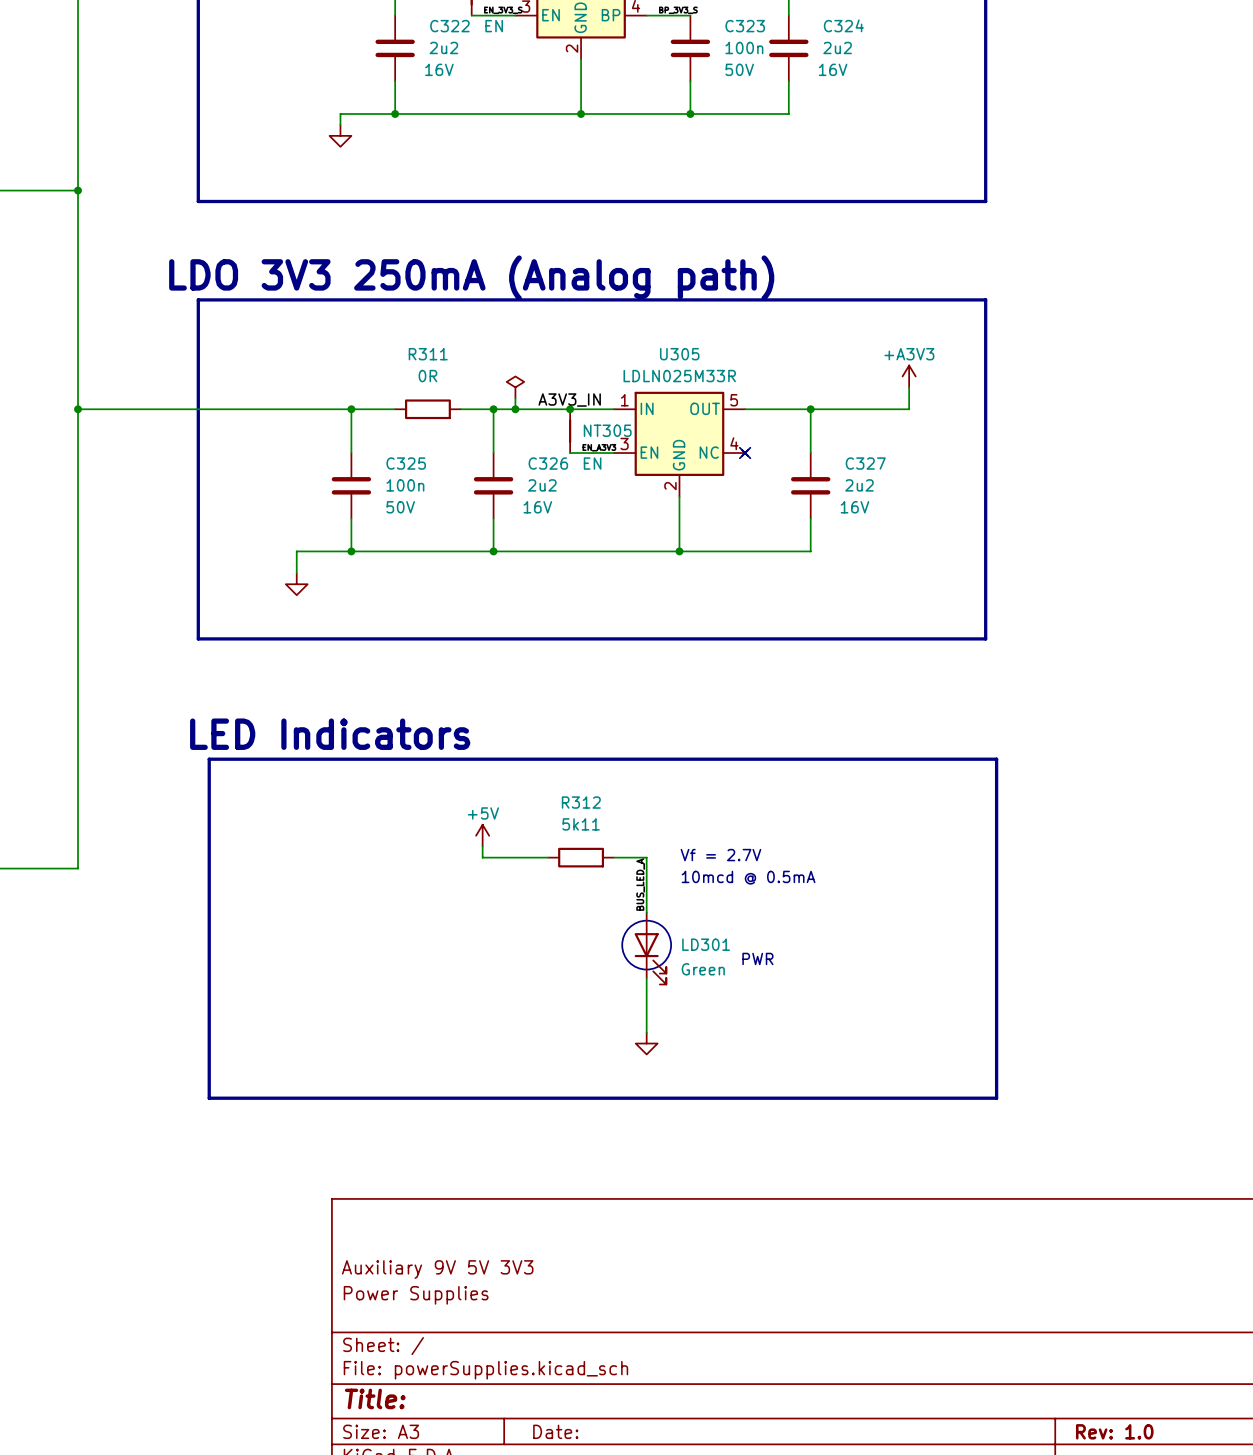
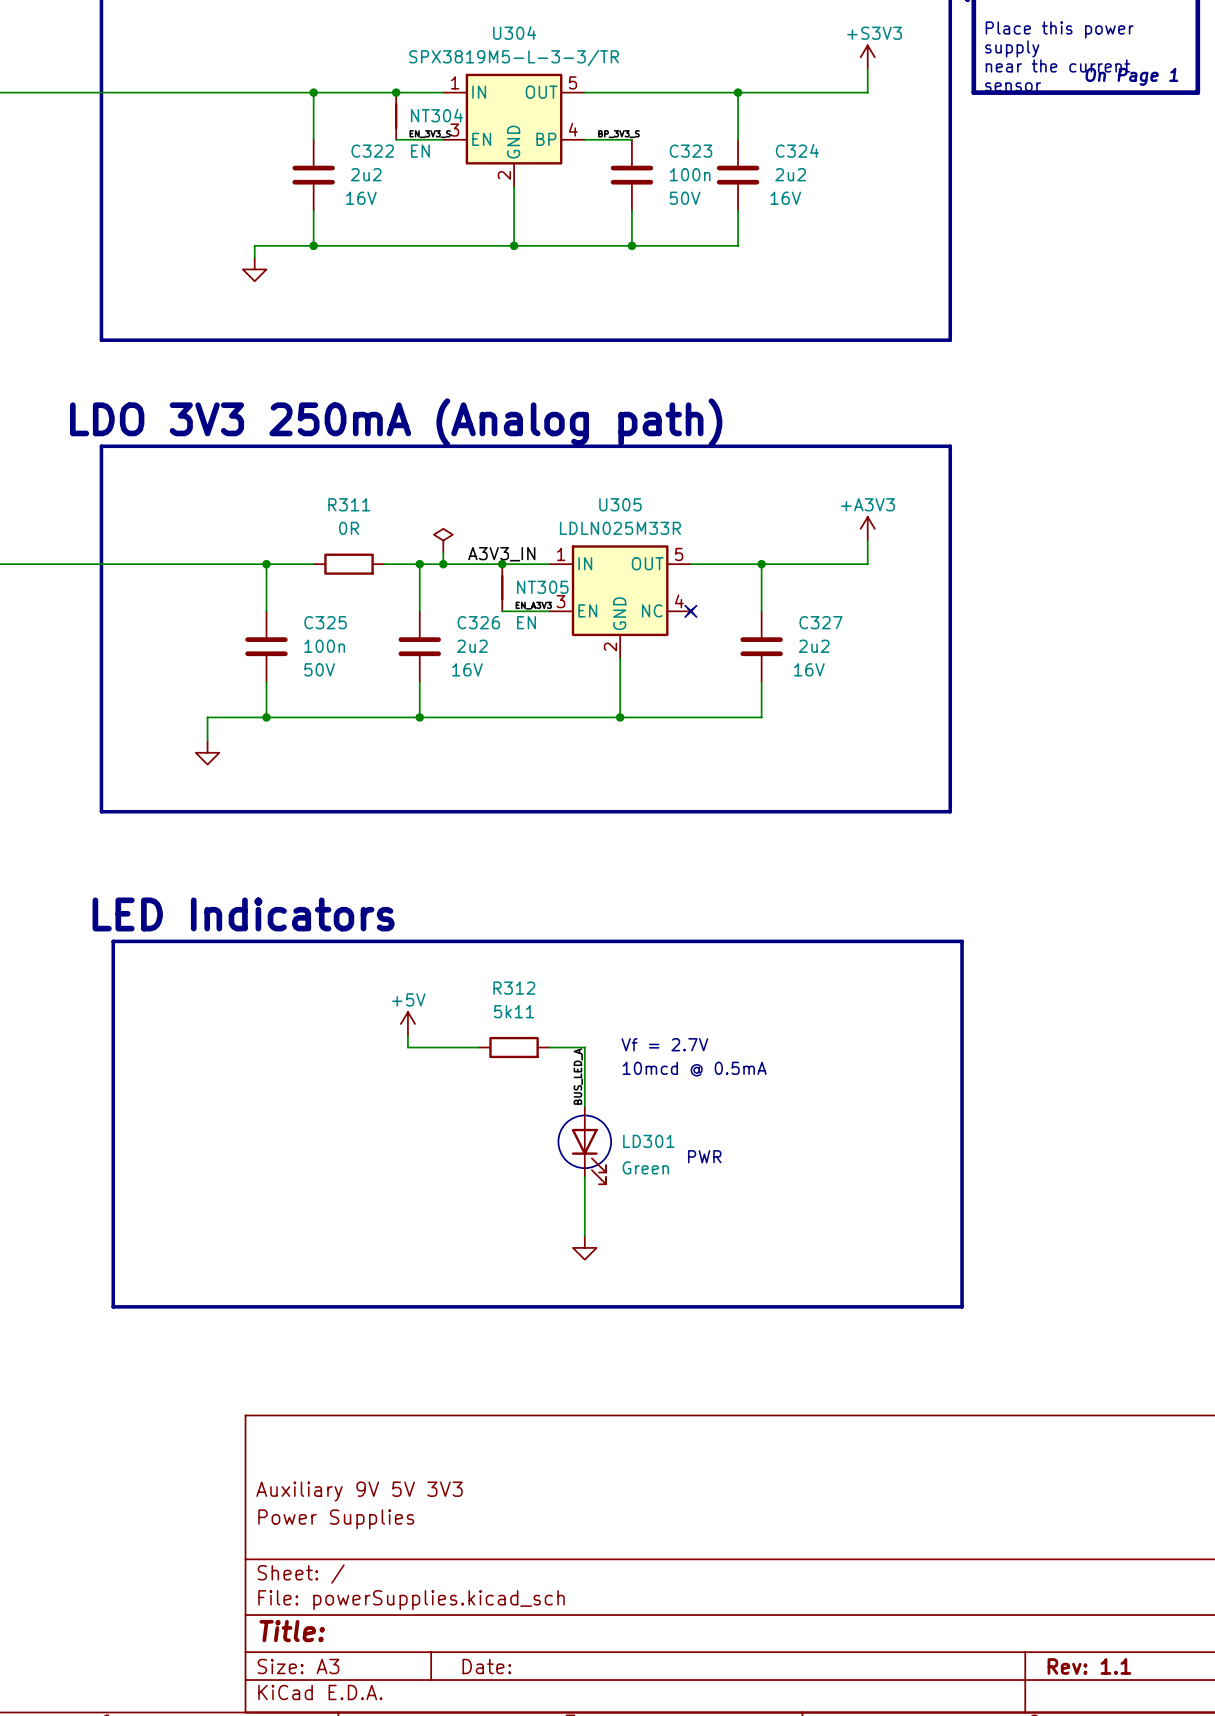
title block: Rev: 1.0 (1114, 1431) -> Rev: 1.1 (1089, 1666)

